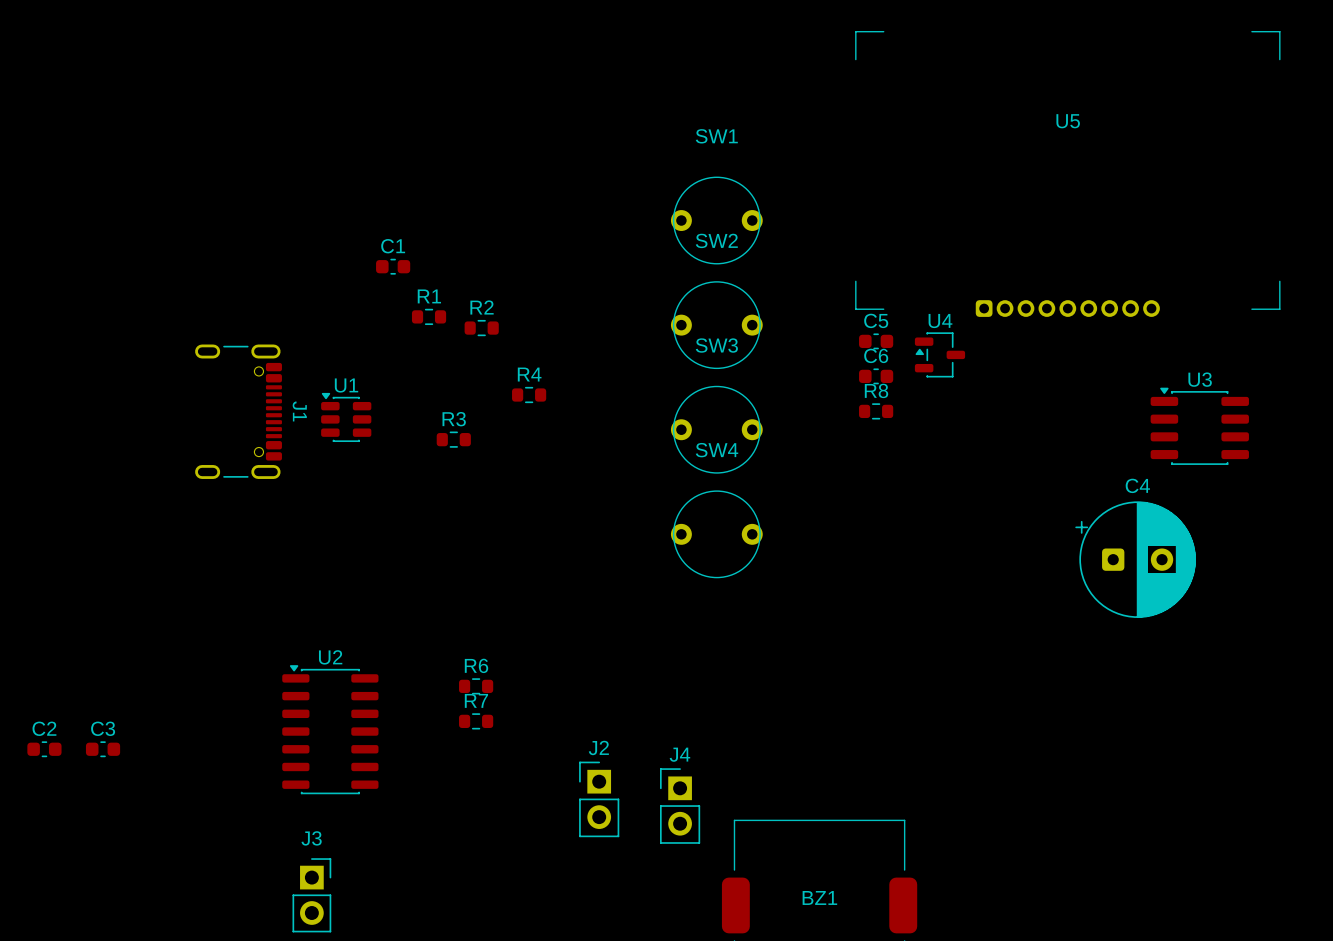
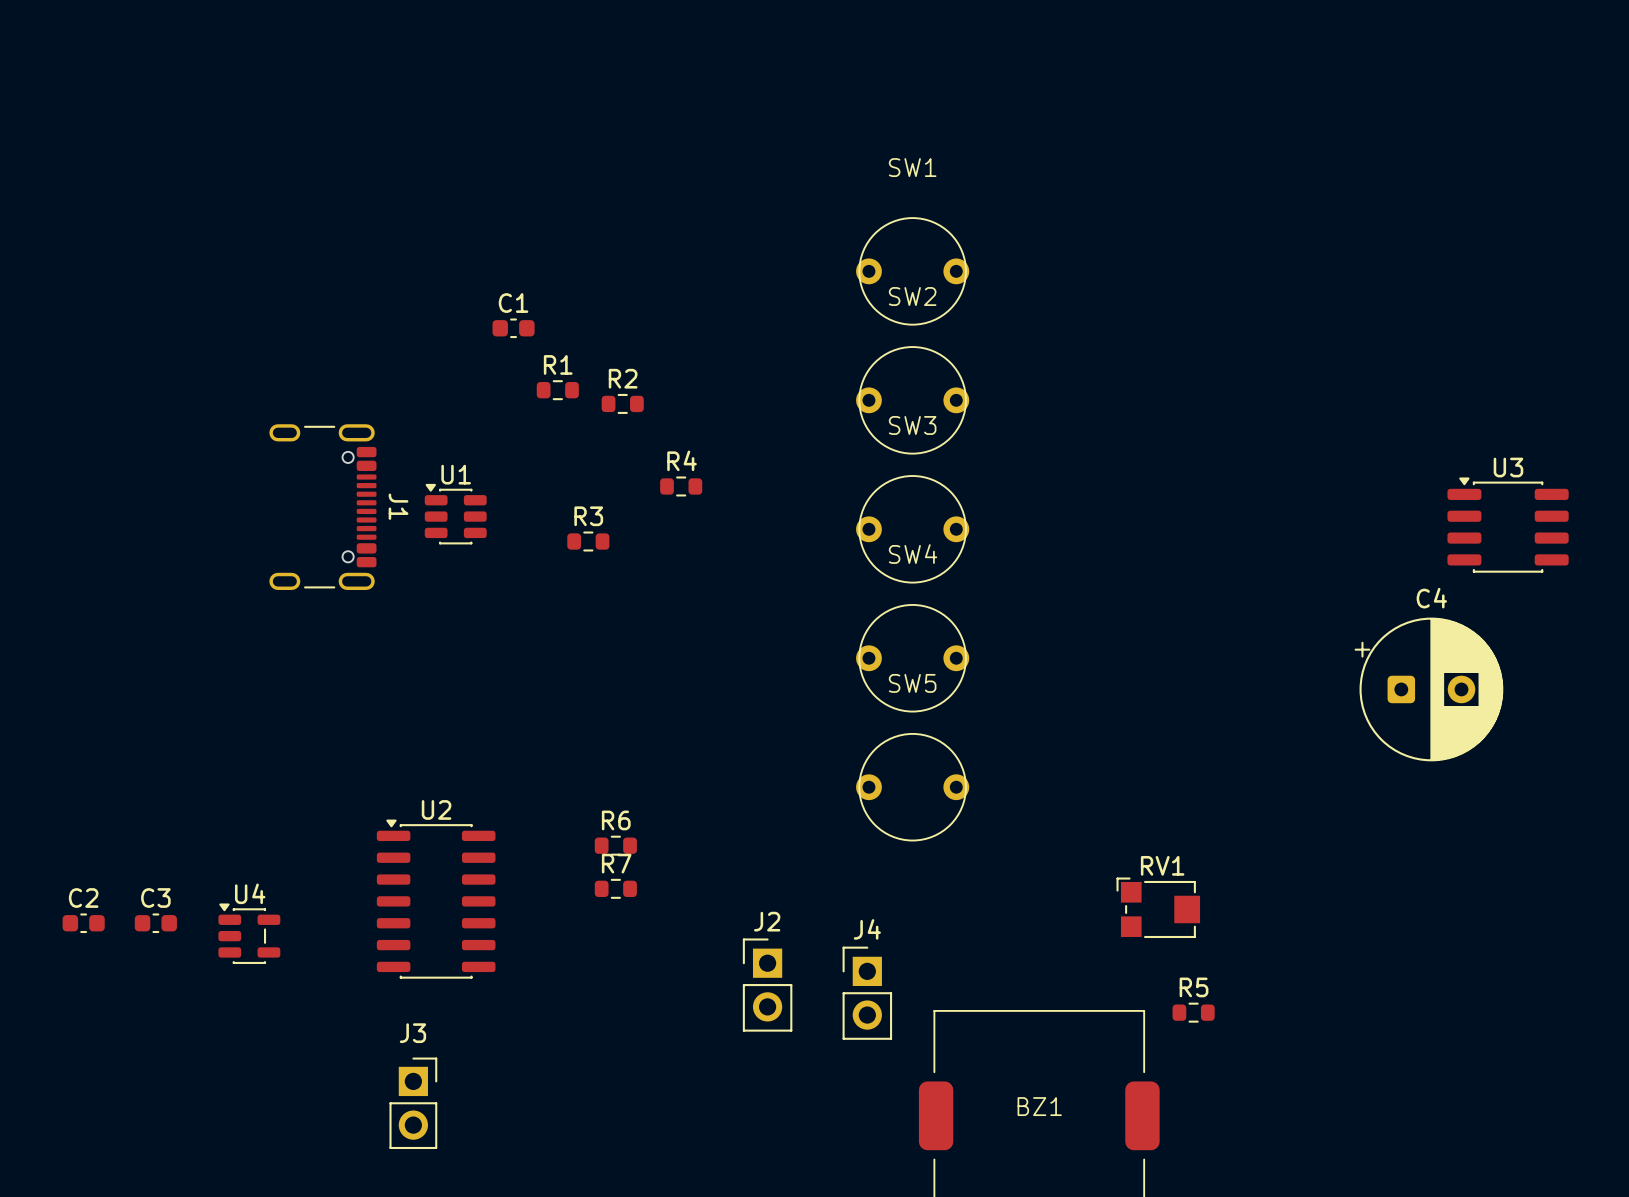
U5: (1067, 173) -> none
U4 footprint: [914, 332, 966, 378] -> [218, 903, 281, 964]
C5: (876, 341) -> none
C6: (876, 376) -> none
R8: (876, 411) -> none
SW5: none -> (912, 787)
RV1: none -> (1158, 907)
R5: none -> (1193, 1012)

